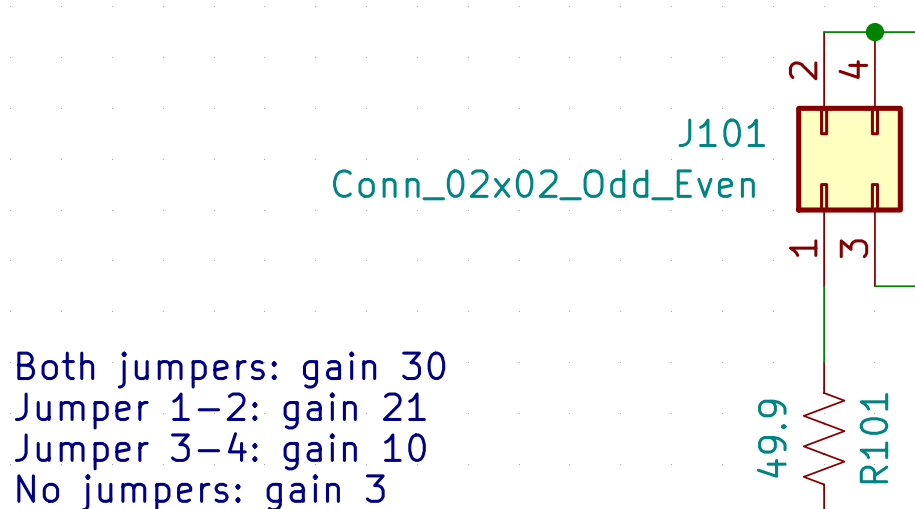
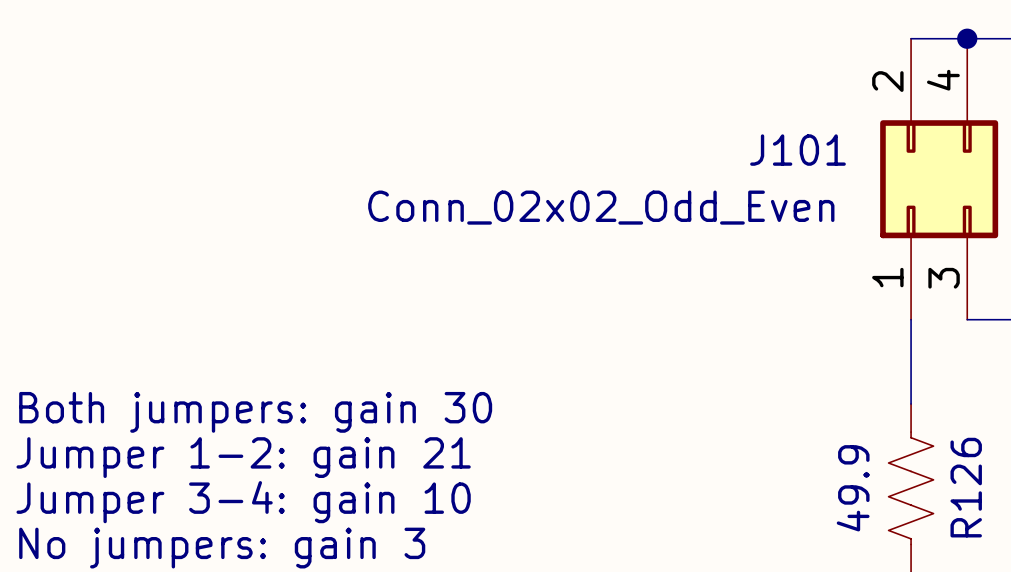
R101 name: R101 (873, 438) -> R126 (966, 487)

